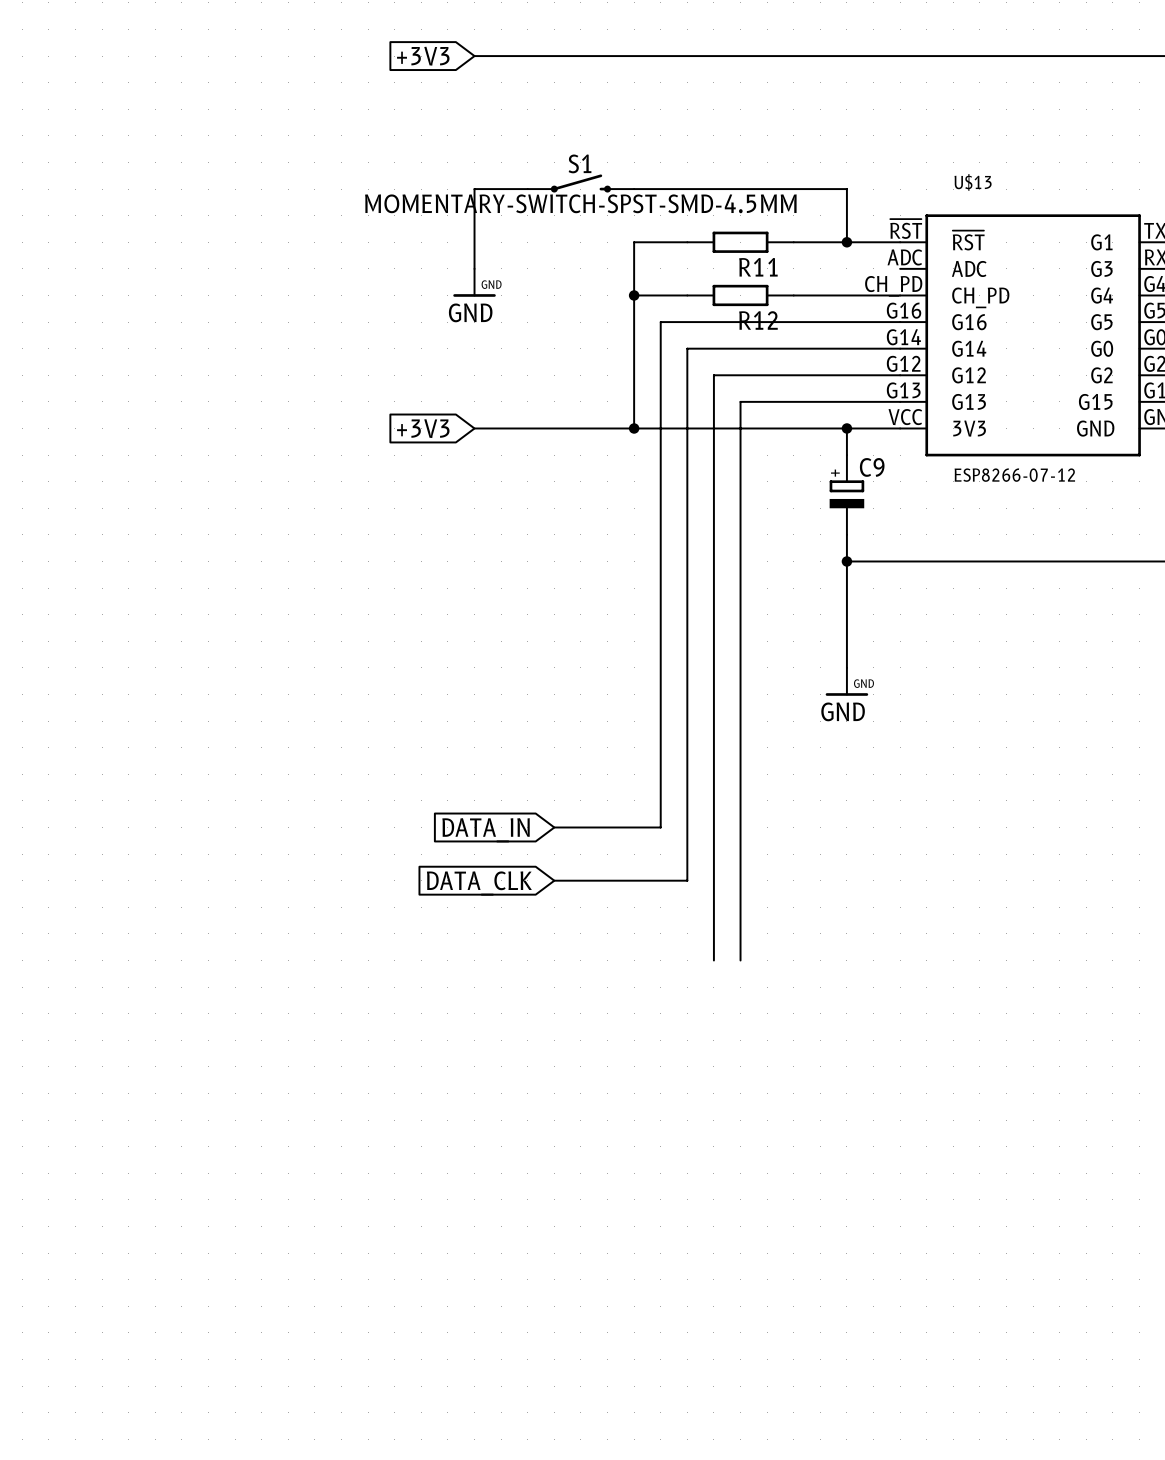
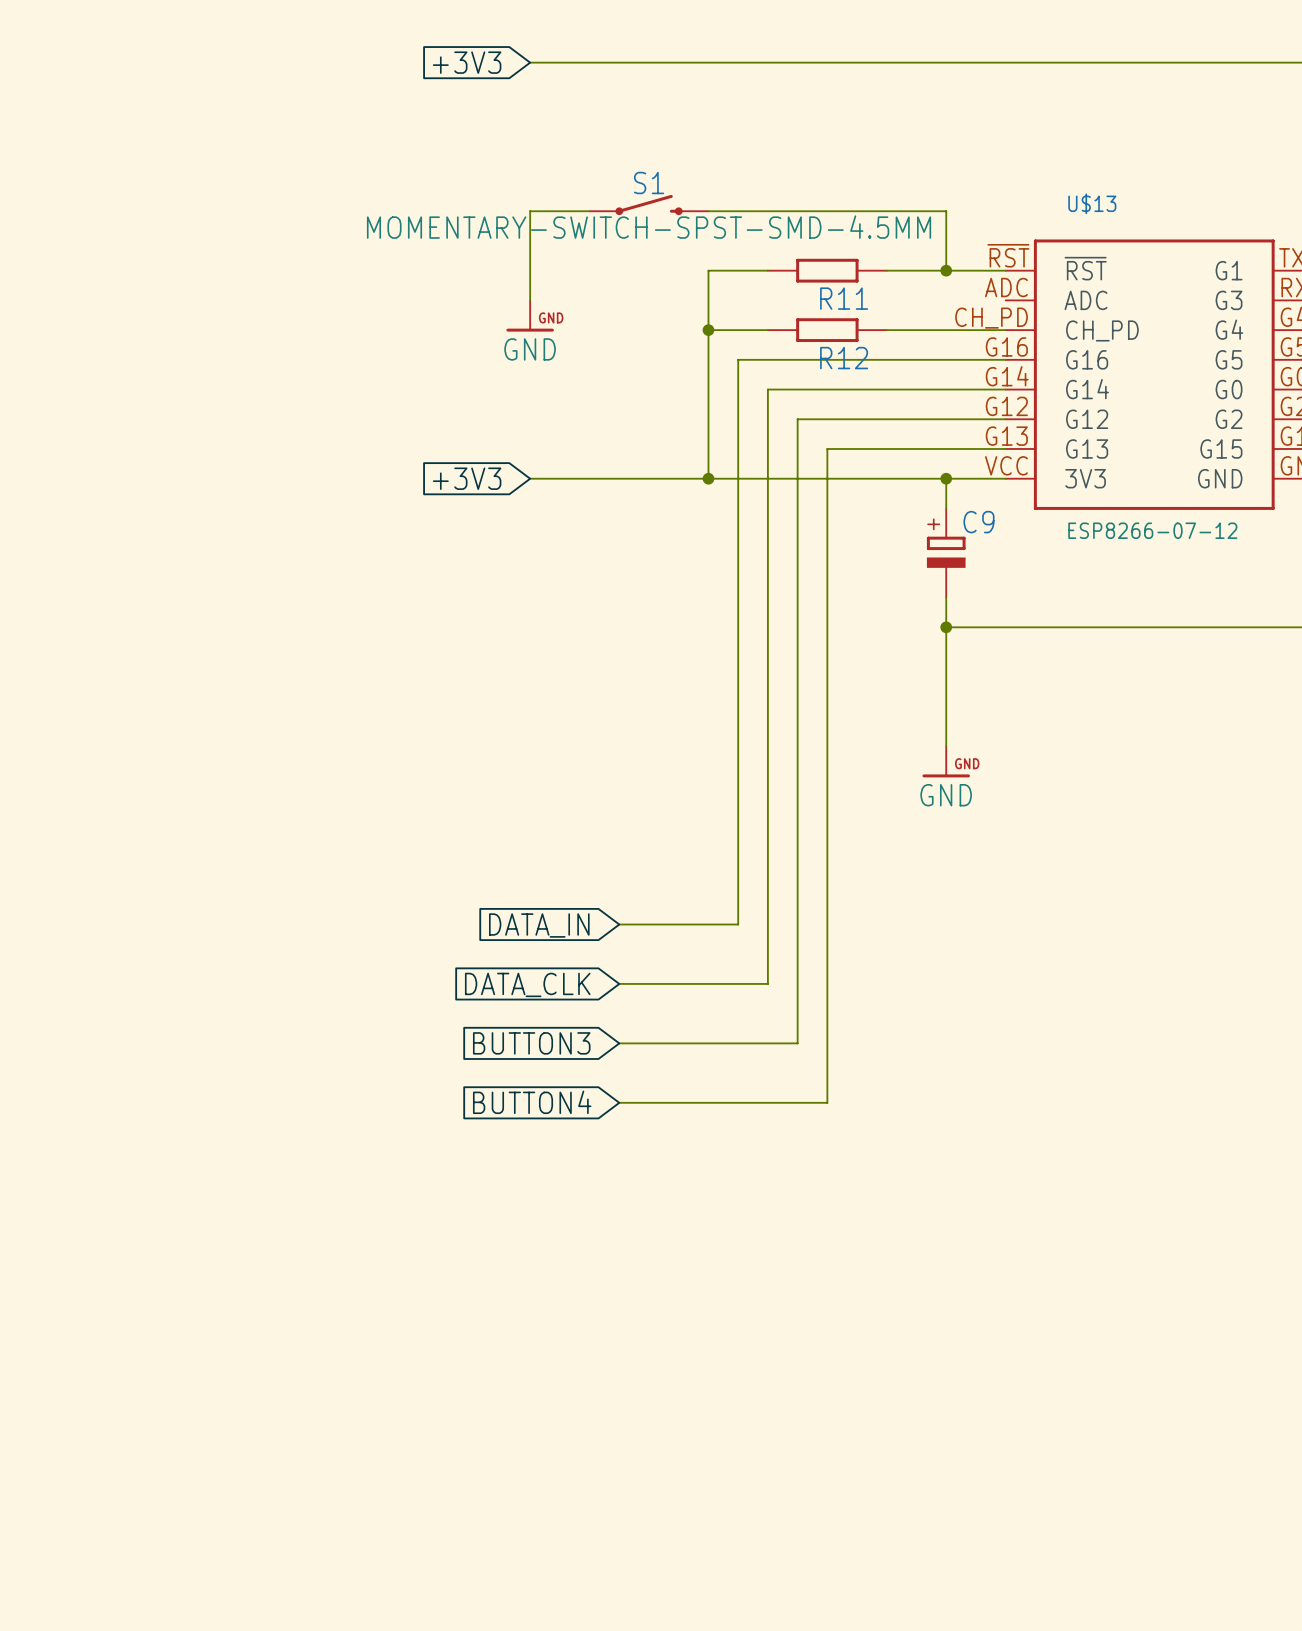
global label: none -> BUTTON3 (531, 1043)
wire: (713, 933) (713, 960) -> (797, 1043) (619, 1043)
wire: none -> (827, 1073) (827, 1102) (619, 1102)
global label: none -> BUTTON4 (532, 1102)

